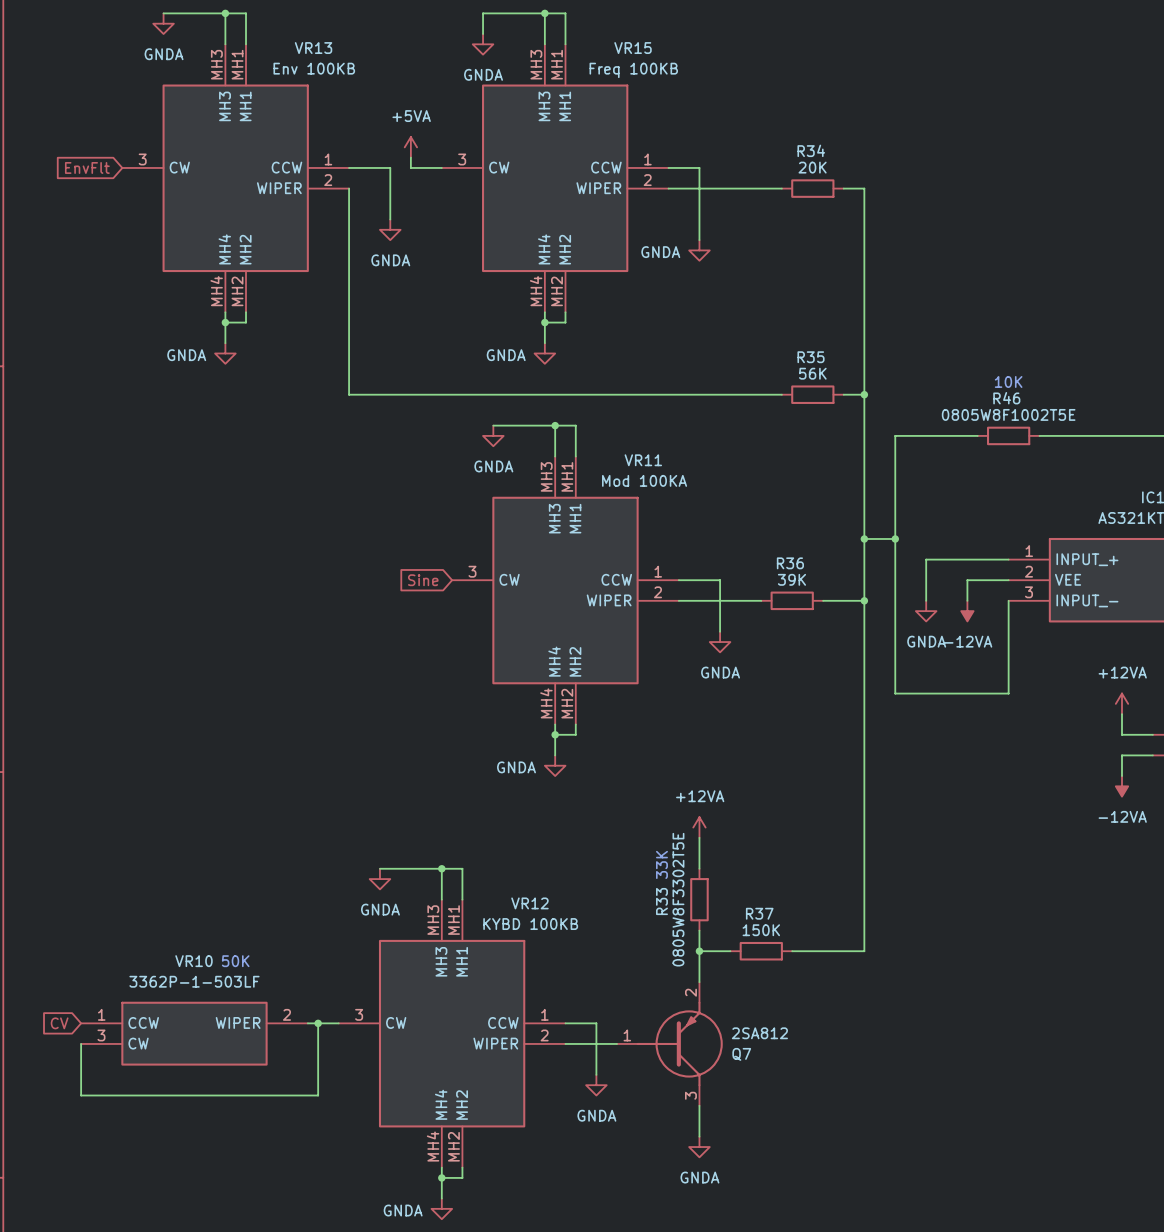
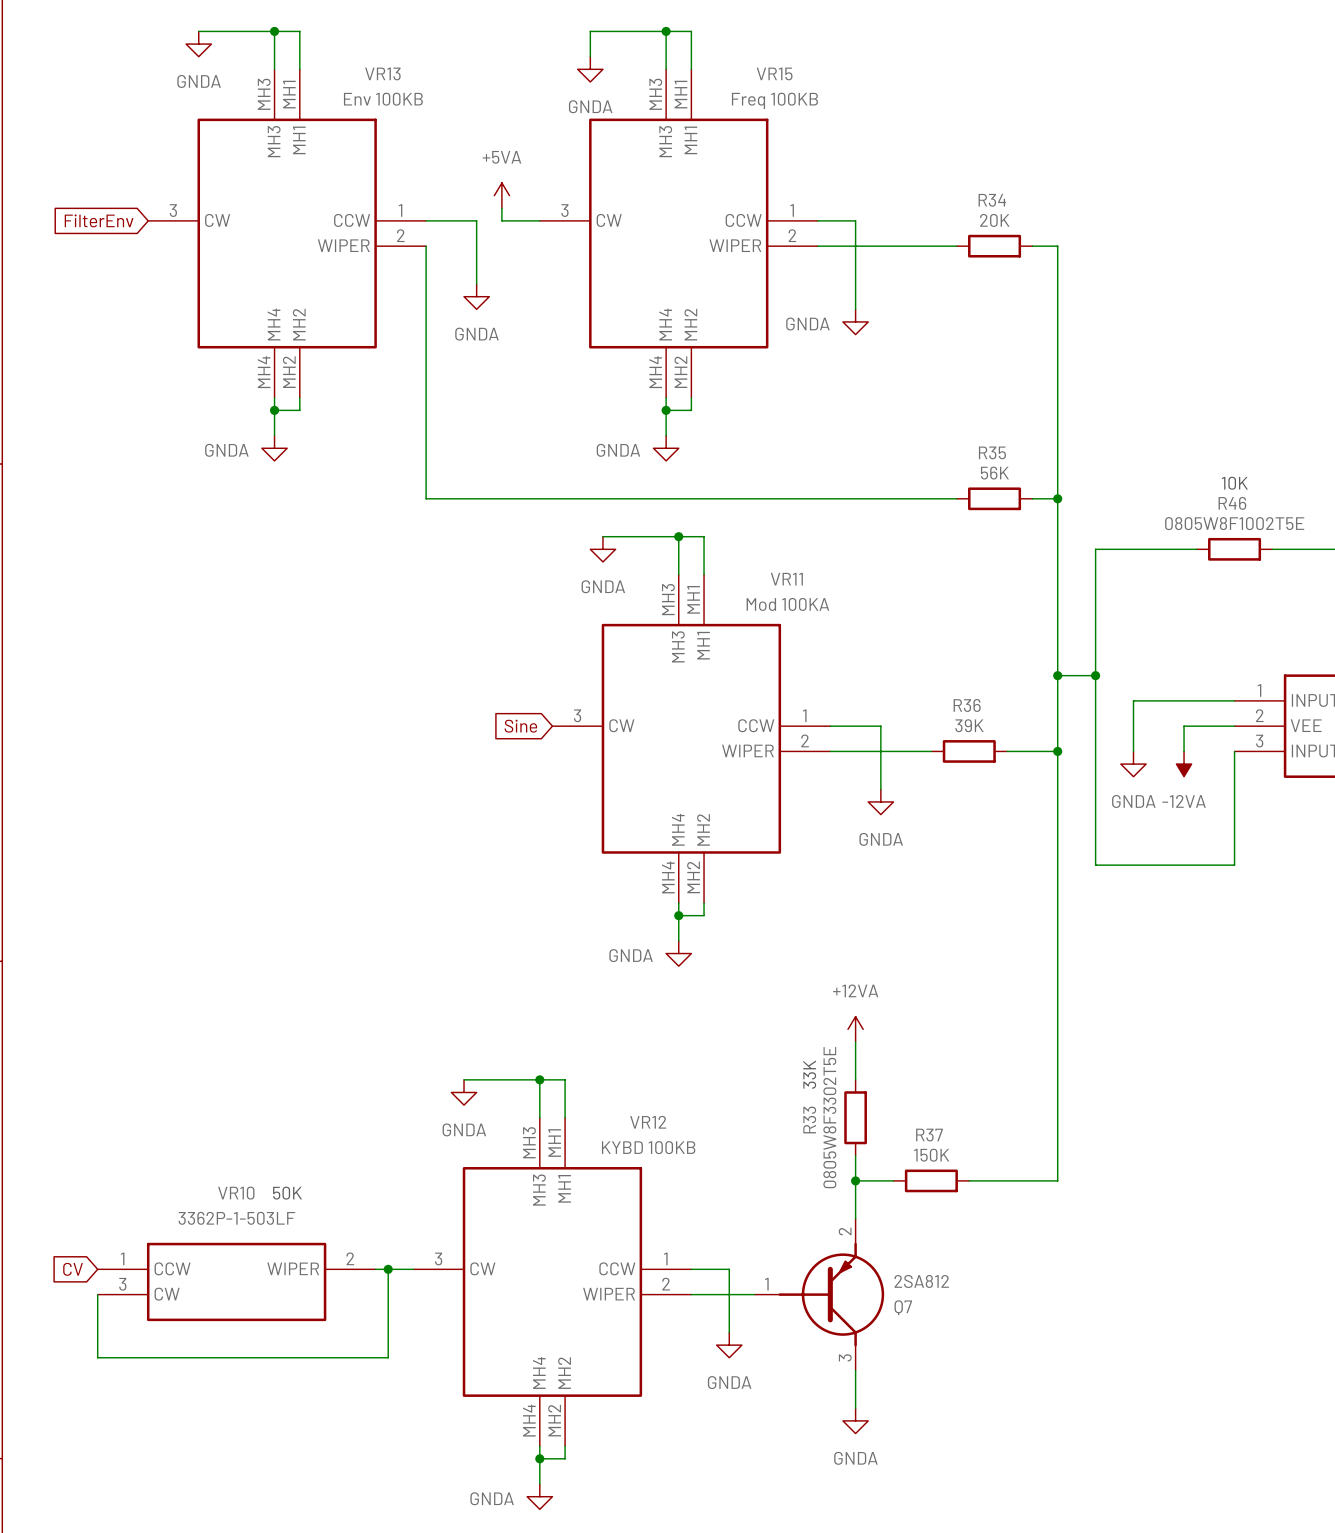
global label: EnvFlt (87, 167) -> FilterEnv (99, 220)

